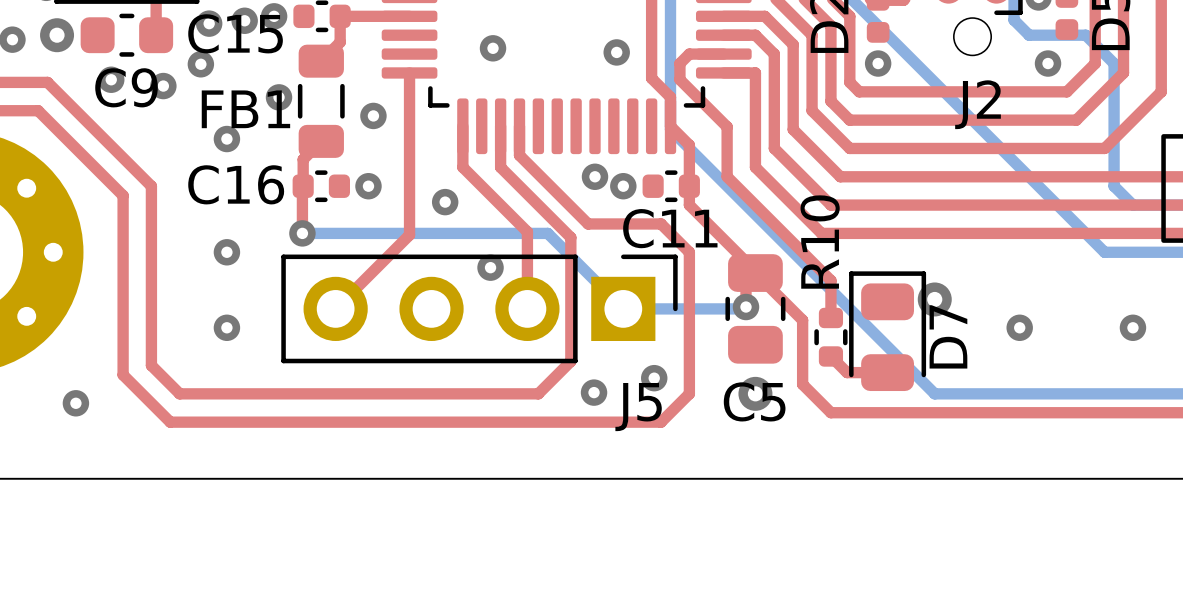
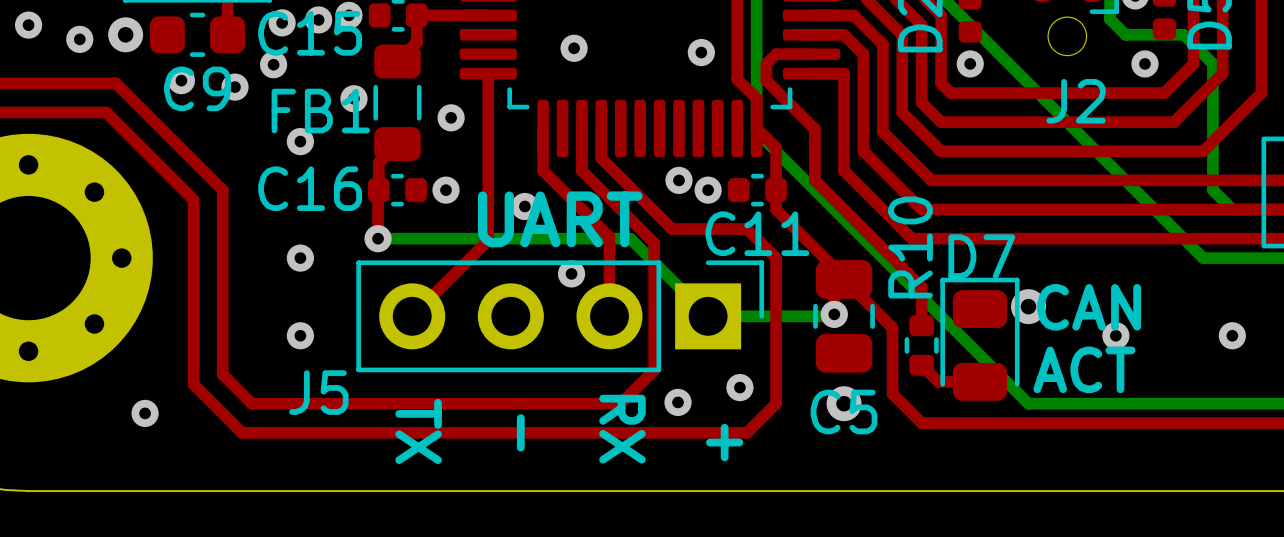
text: none -> UART (560, 219)
text: none -> CAN (1089, 307)
D7 name rotation: 0° (948, 336) -> 90° clockwise (981, 256)
D7 name position: D7 (948, 336) -> D7 (981, 256)
text: none -> ACT (1084, 369)
text: none -> - (520, 432)
J5 name position: J5 (638, 407) -> J5 (318, 392)
text: none -> RX (622, 429)
text: none -> TX (418, 431)
text: none -> + (724, 442)

